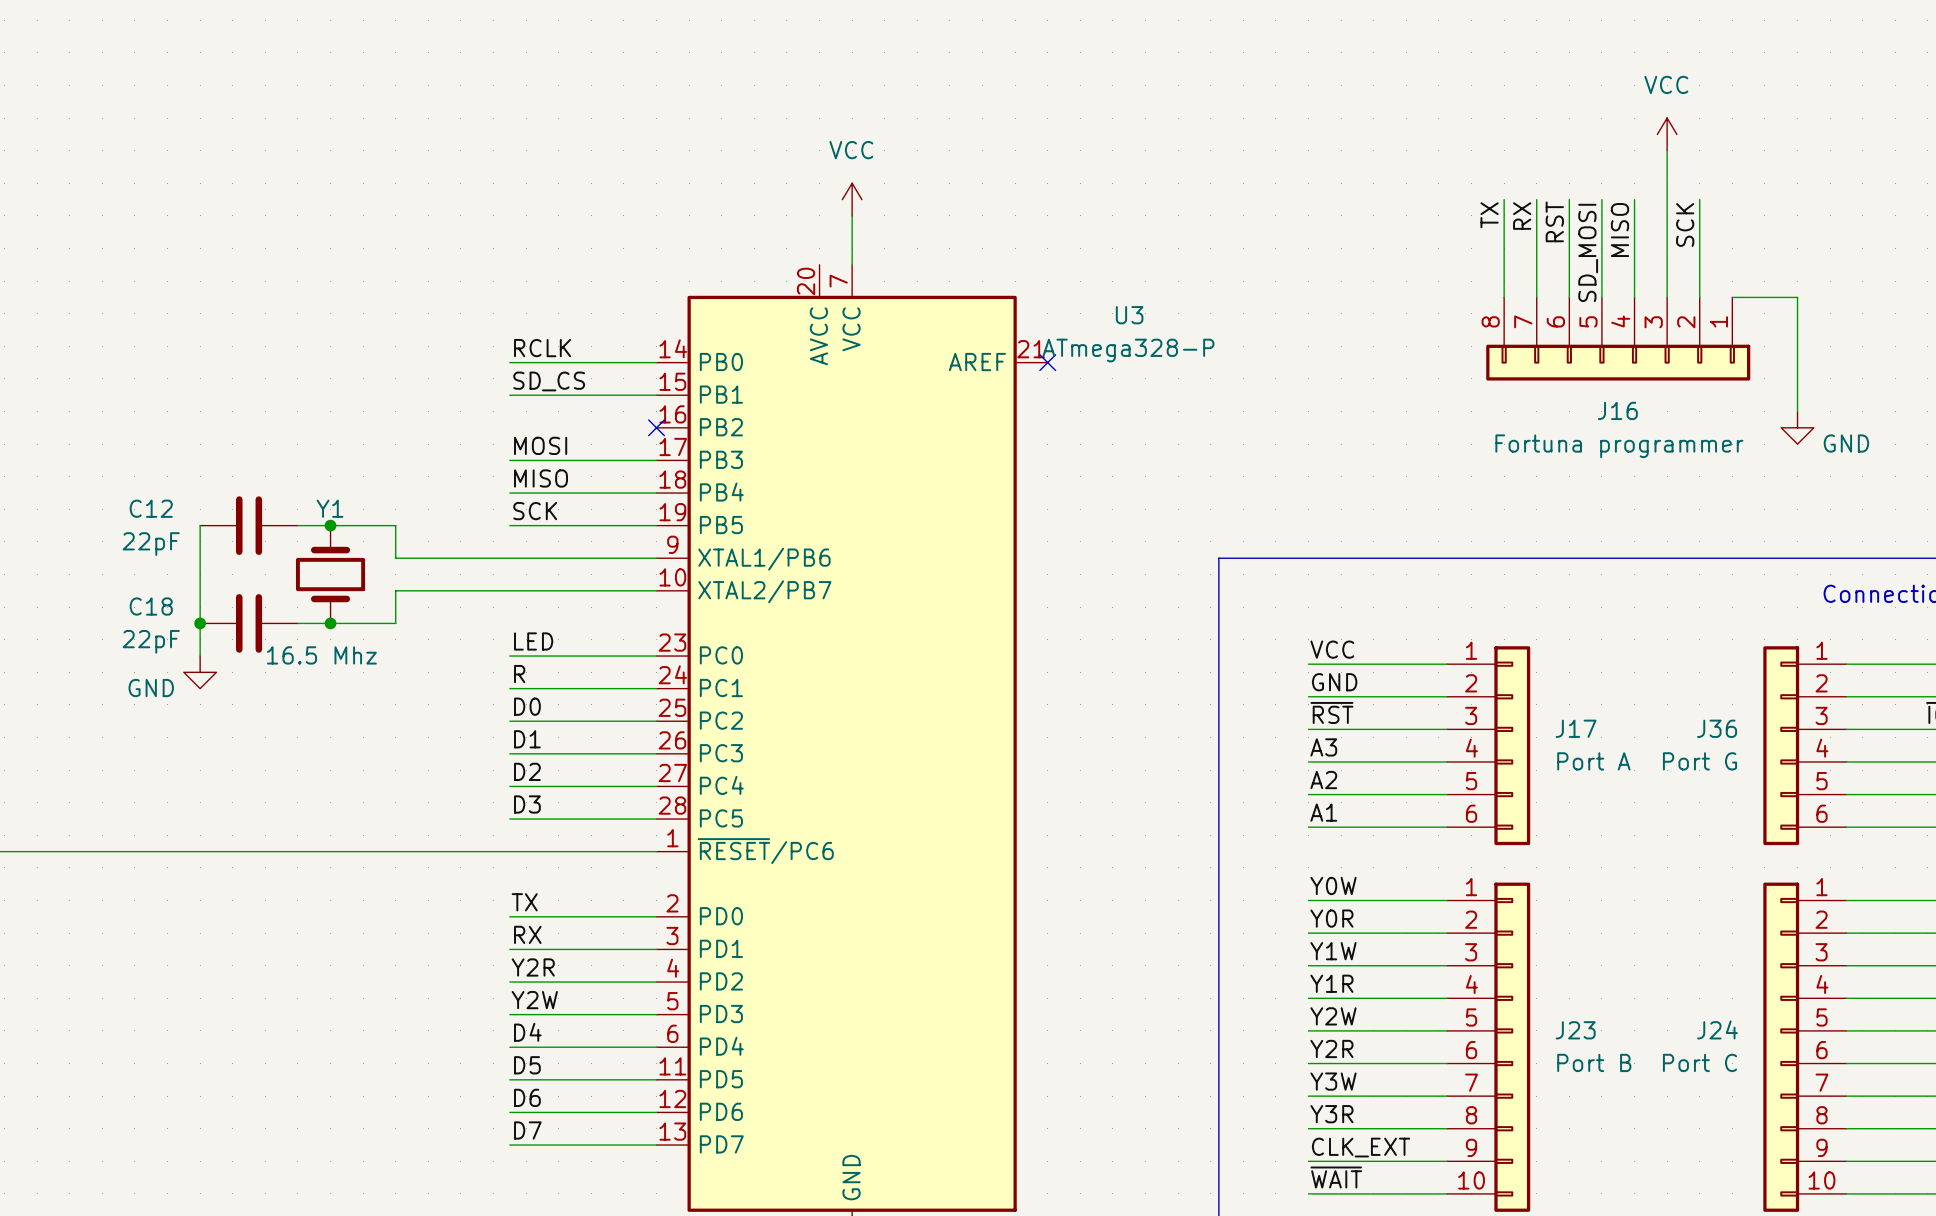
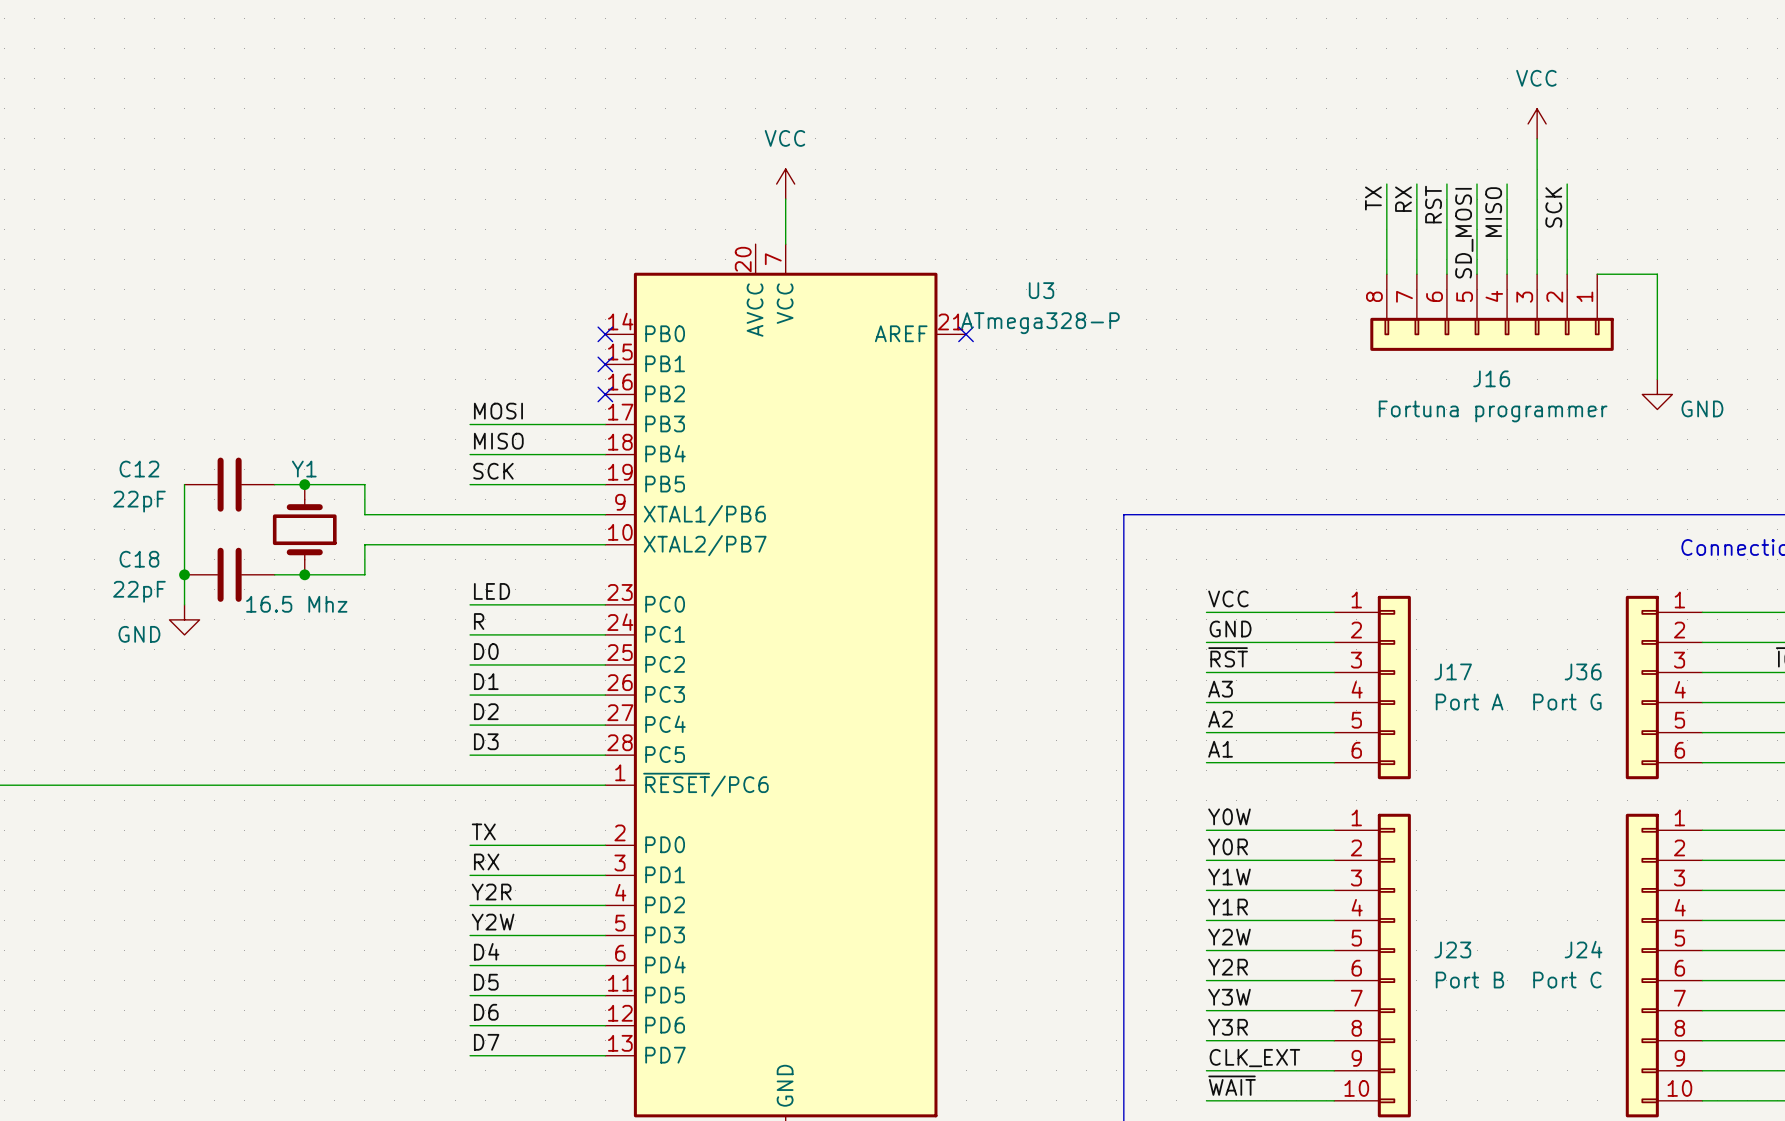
label: RCLK (542, 348) -> none
wire: (509, 362) (656, 362) -> none
no-connect mark: none -> (605, 334)
label: SD_CS (549, 381) -> none
wire: (509, 395) (656, 395) -> none
no-connect mark: none -> (605, 364)

